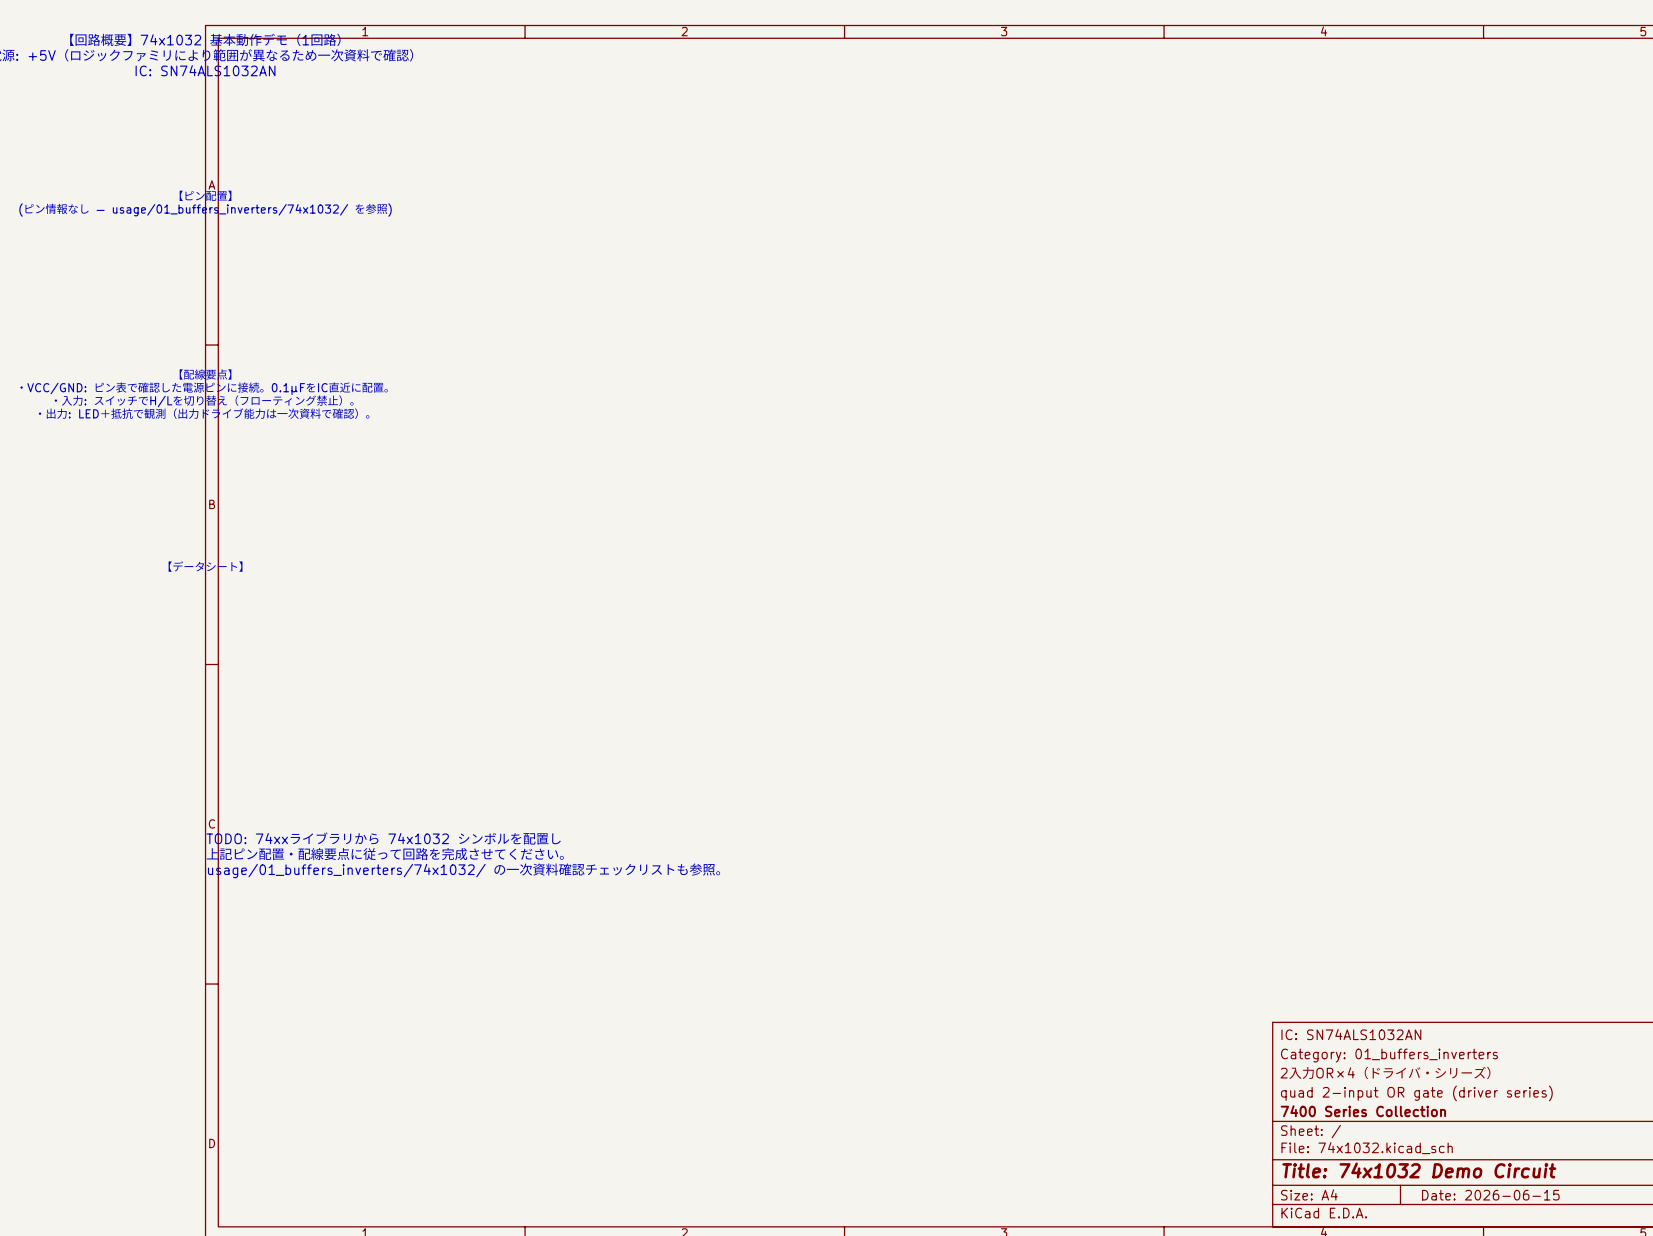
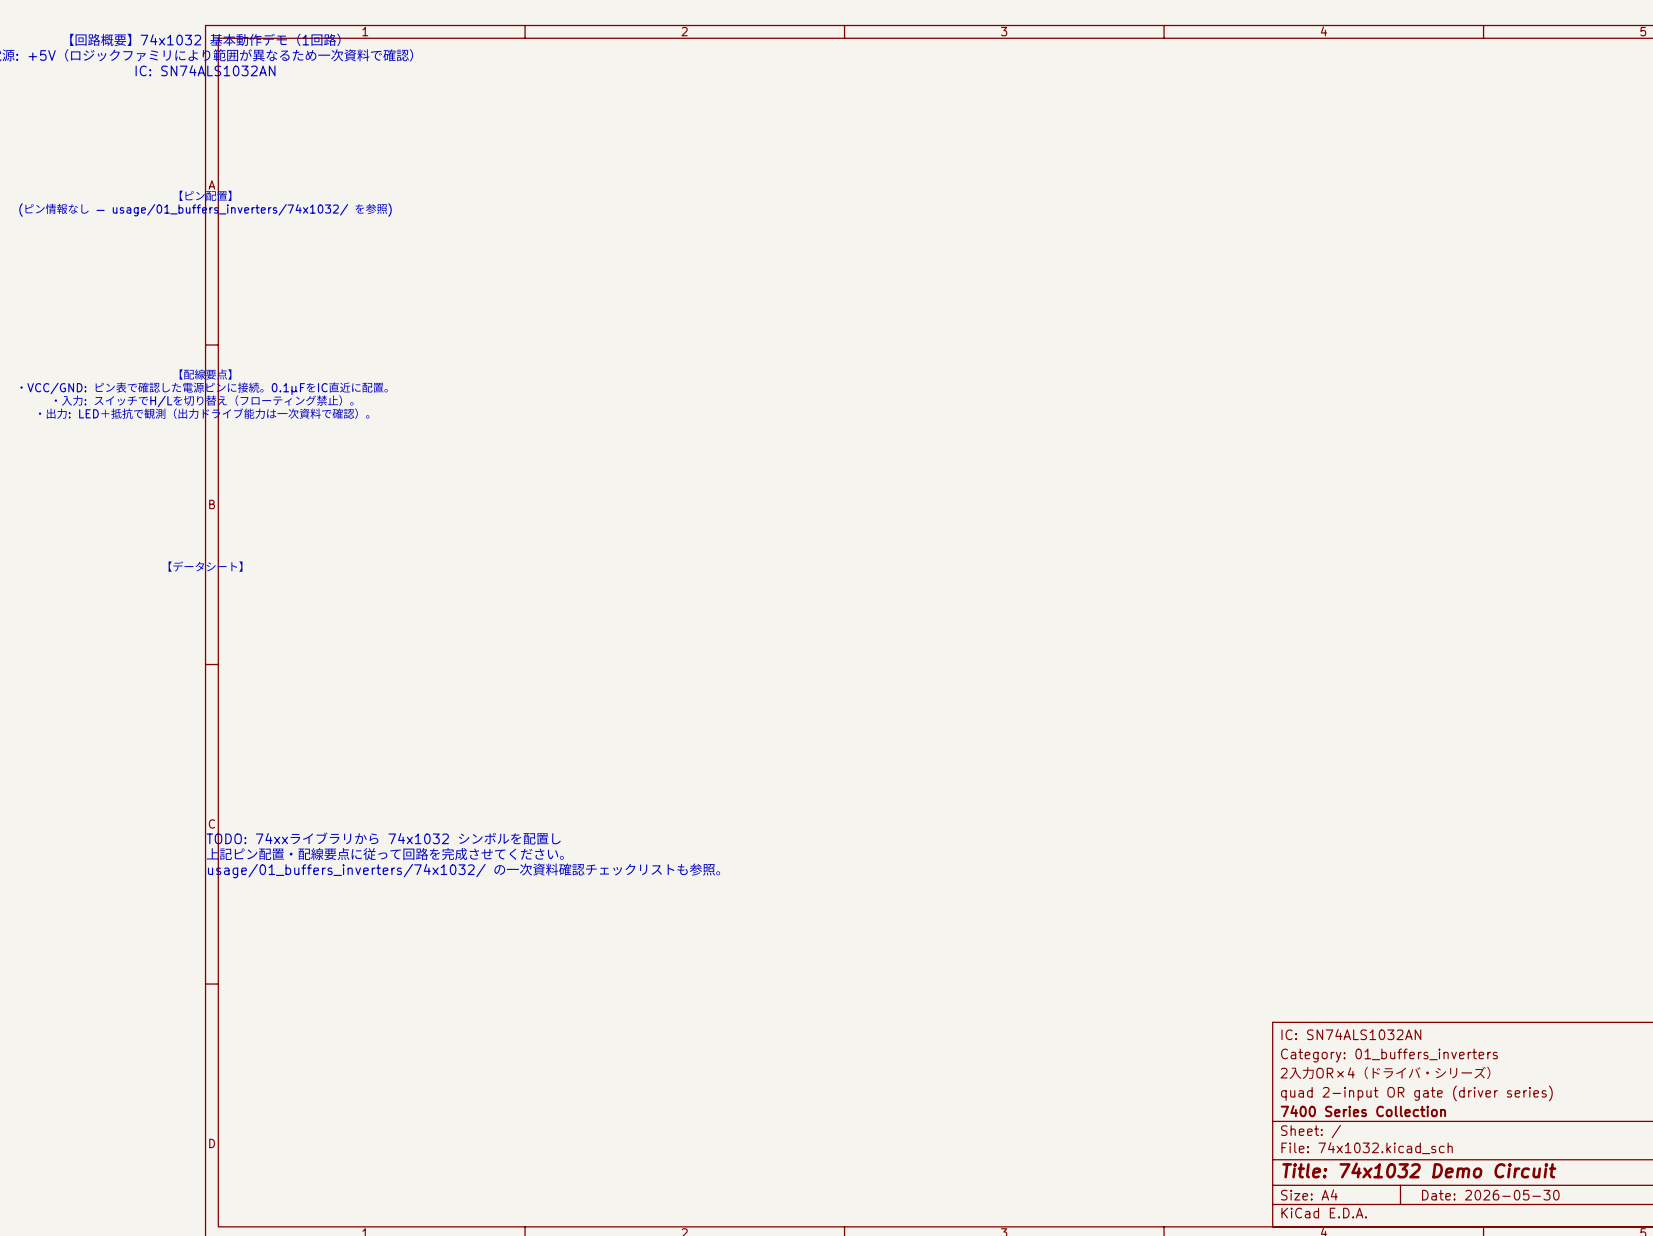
title block: Date: 2026-06-15 (1490, 1195) -> Date: 2026-05-30 (1490, 1195)

